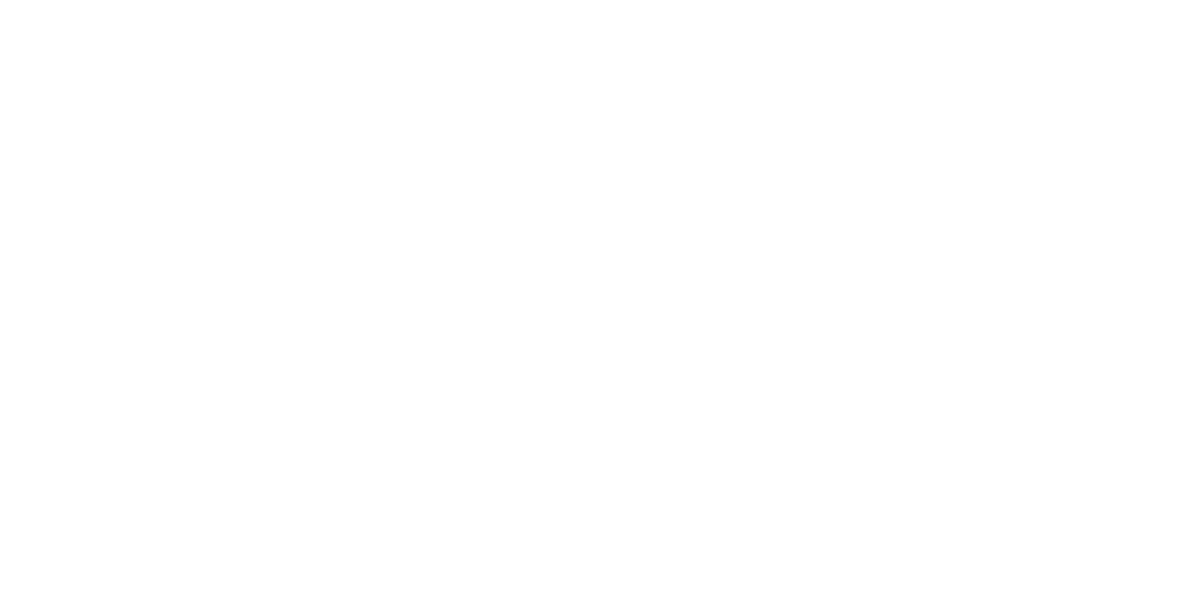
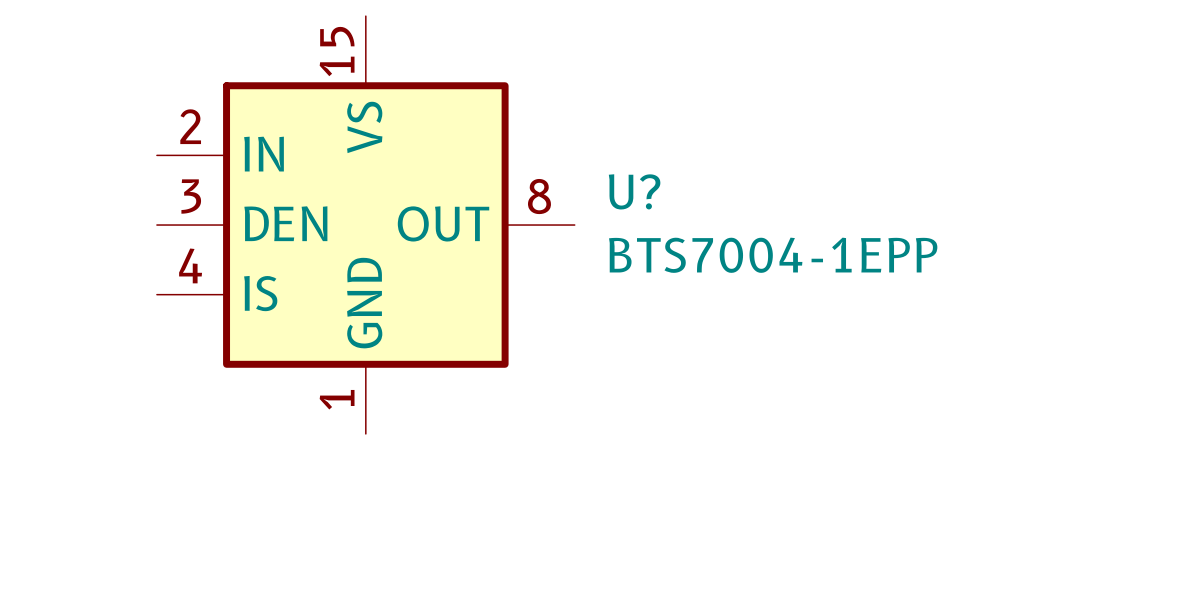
U?: none -> BTS7004-1EPP (365, 225)

